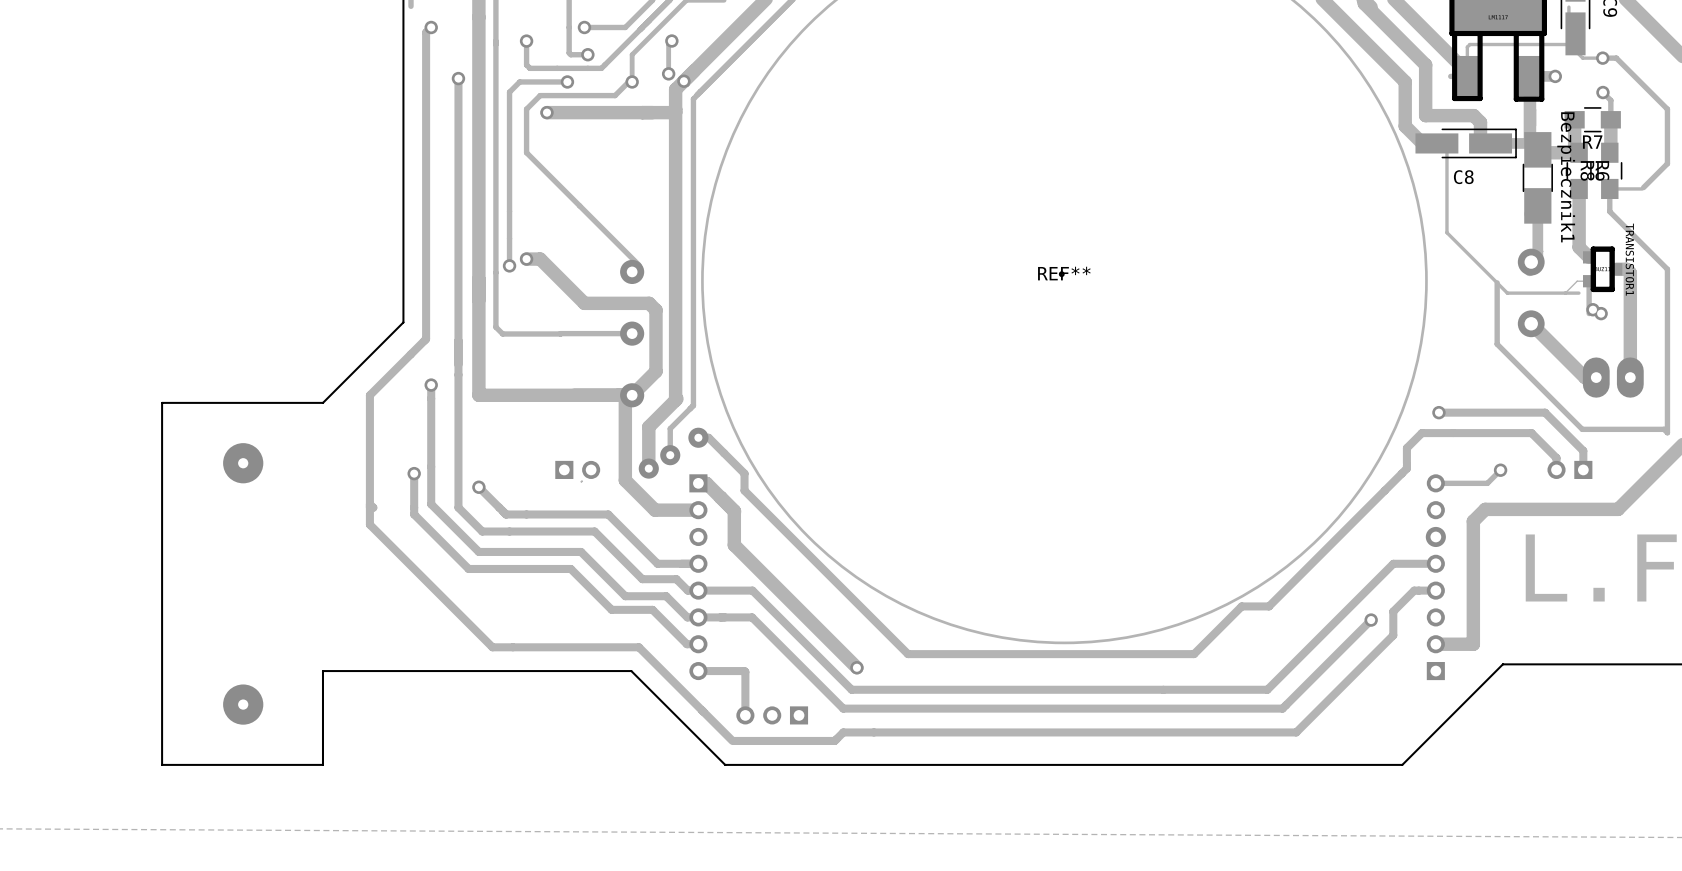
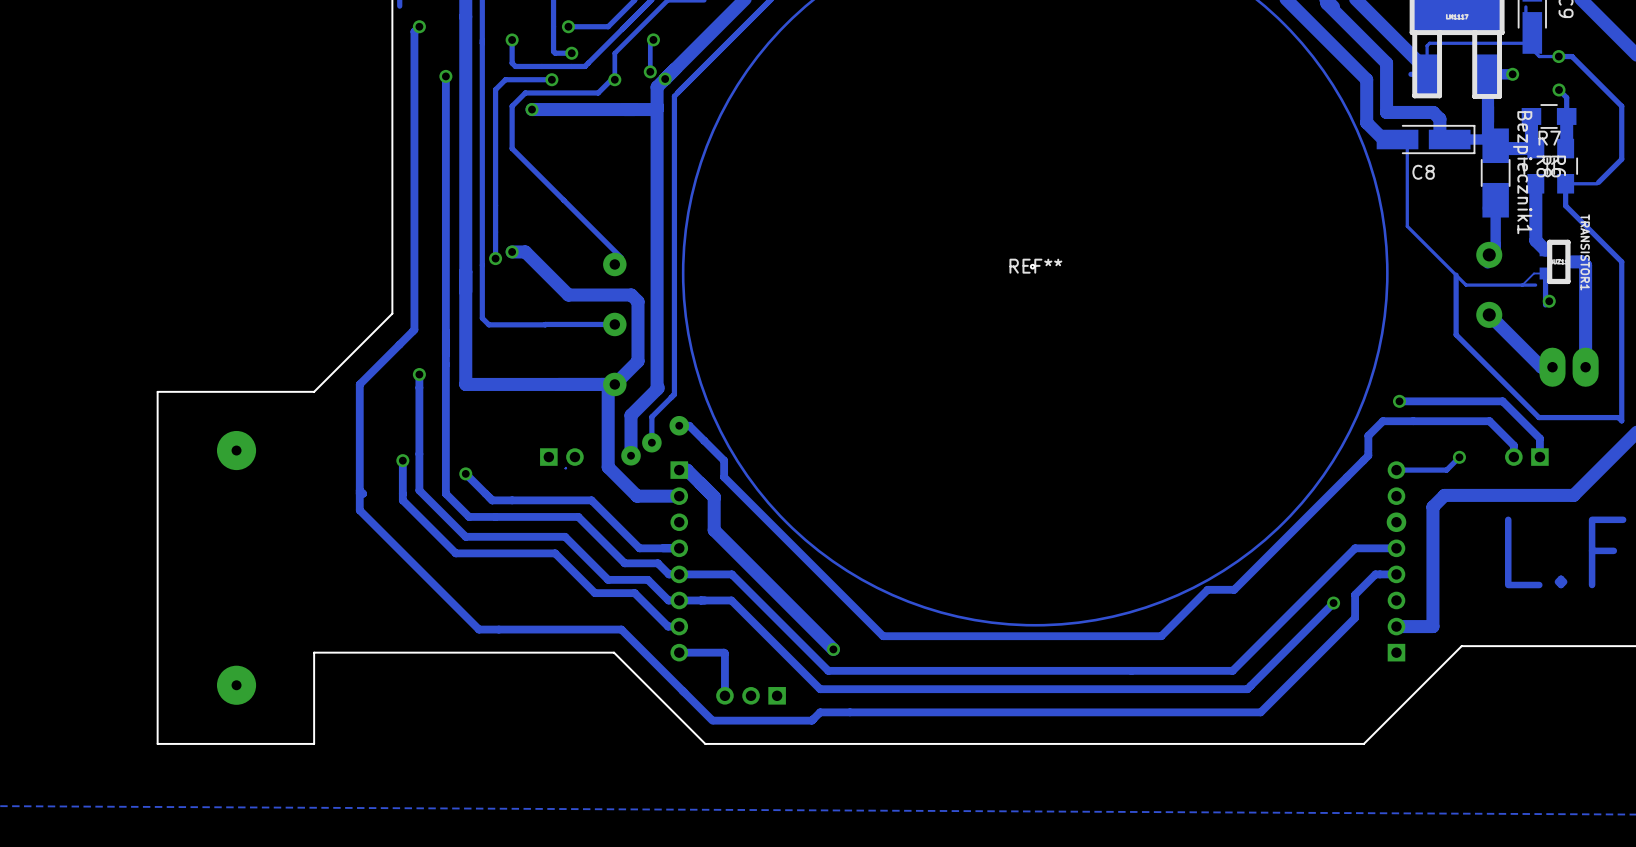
via: (1601, 313) -> none

